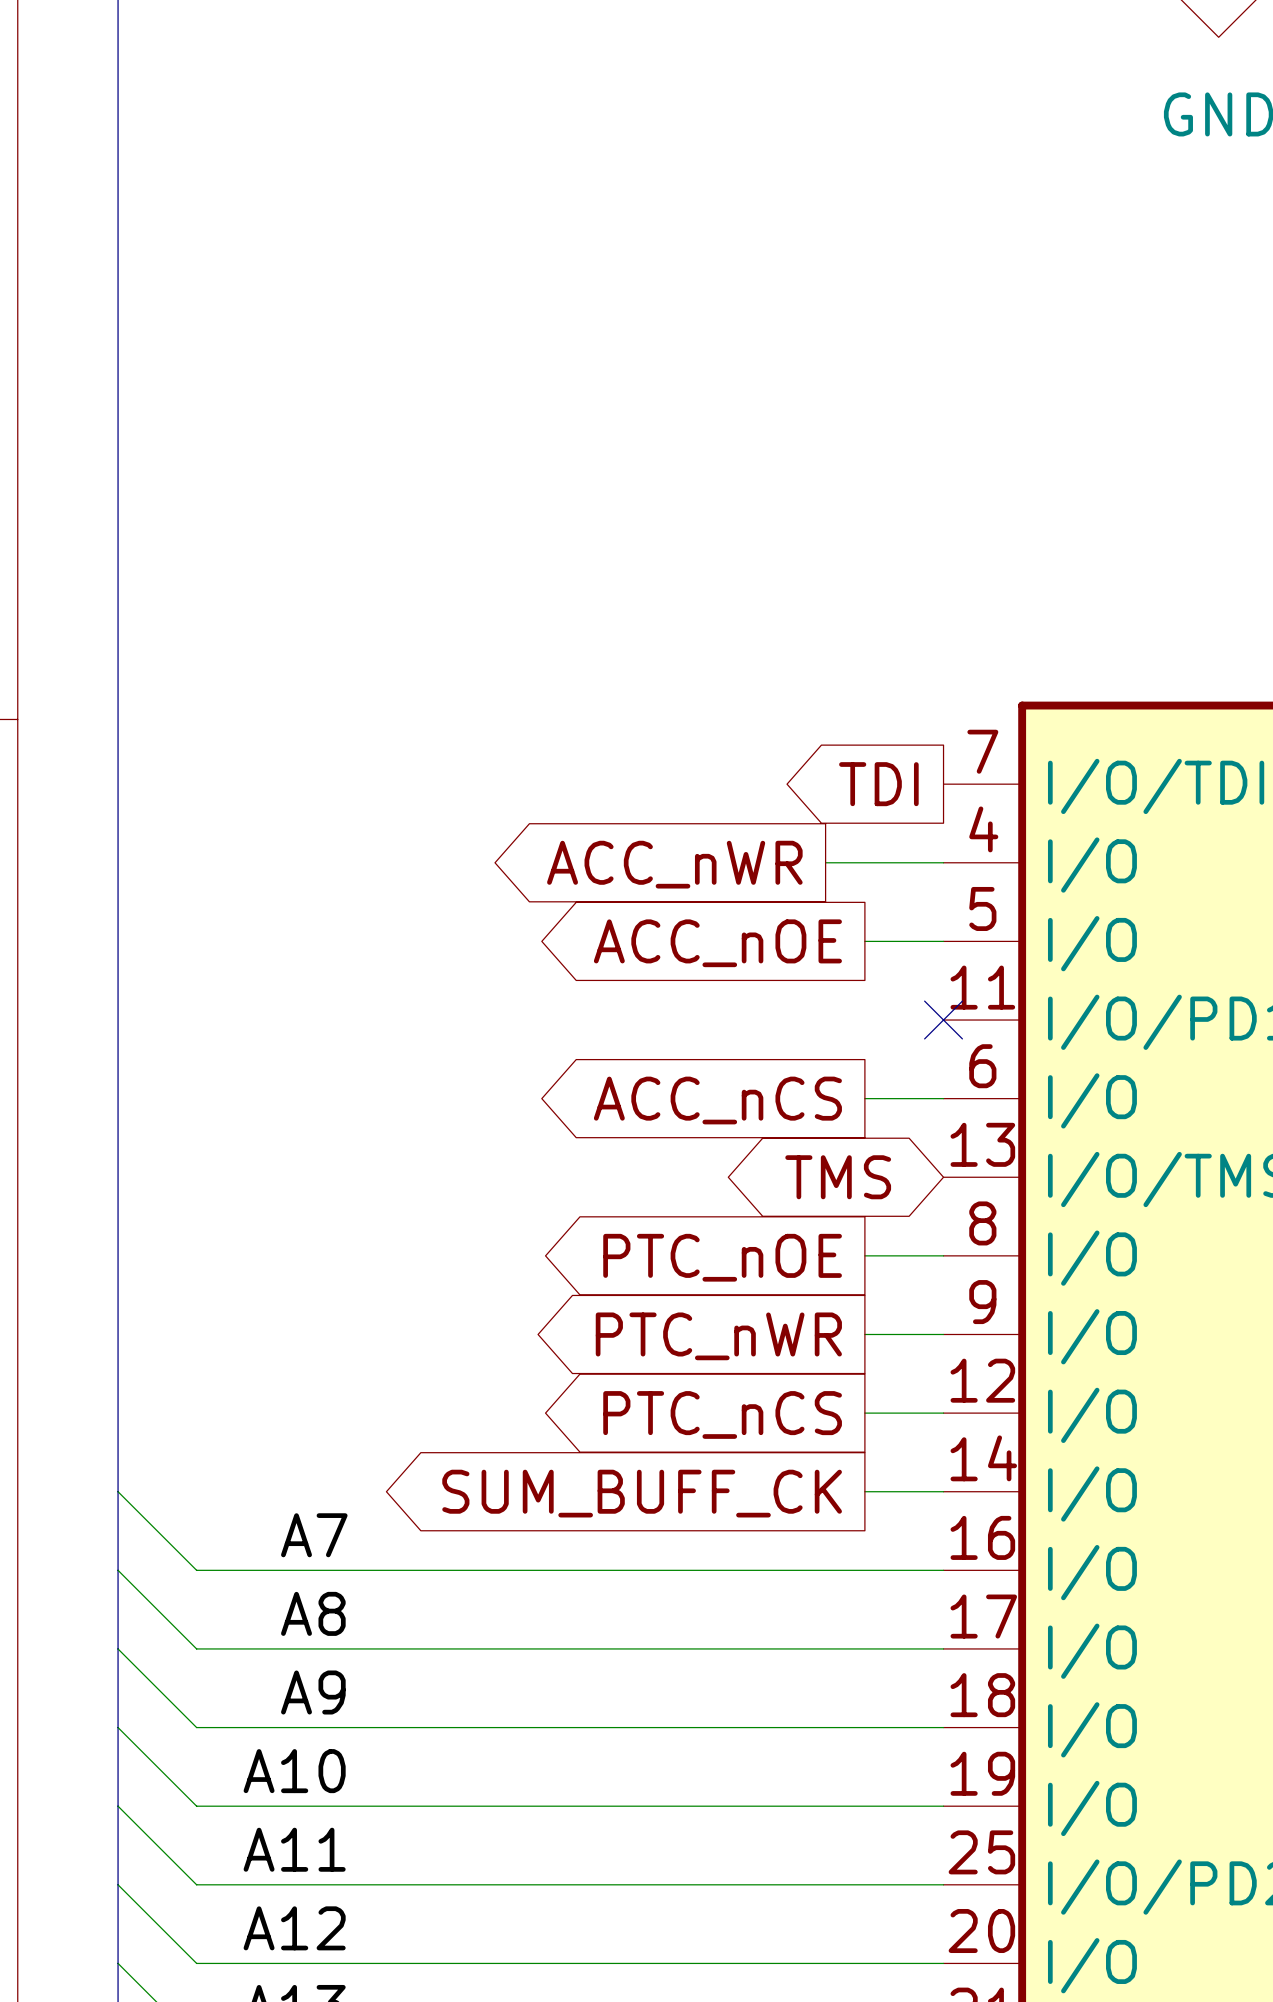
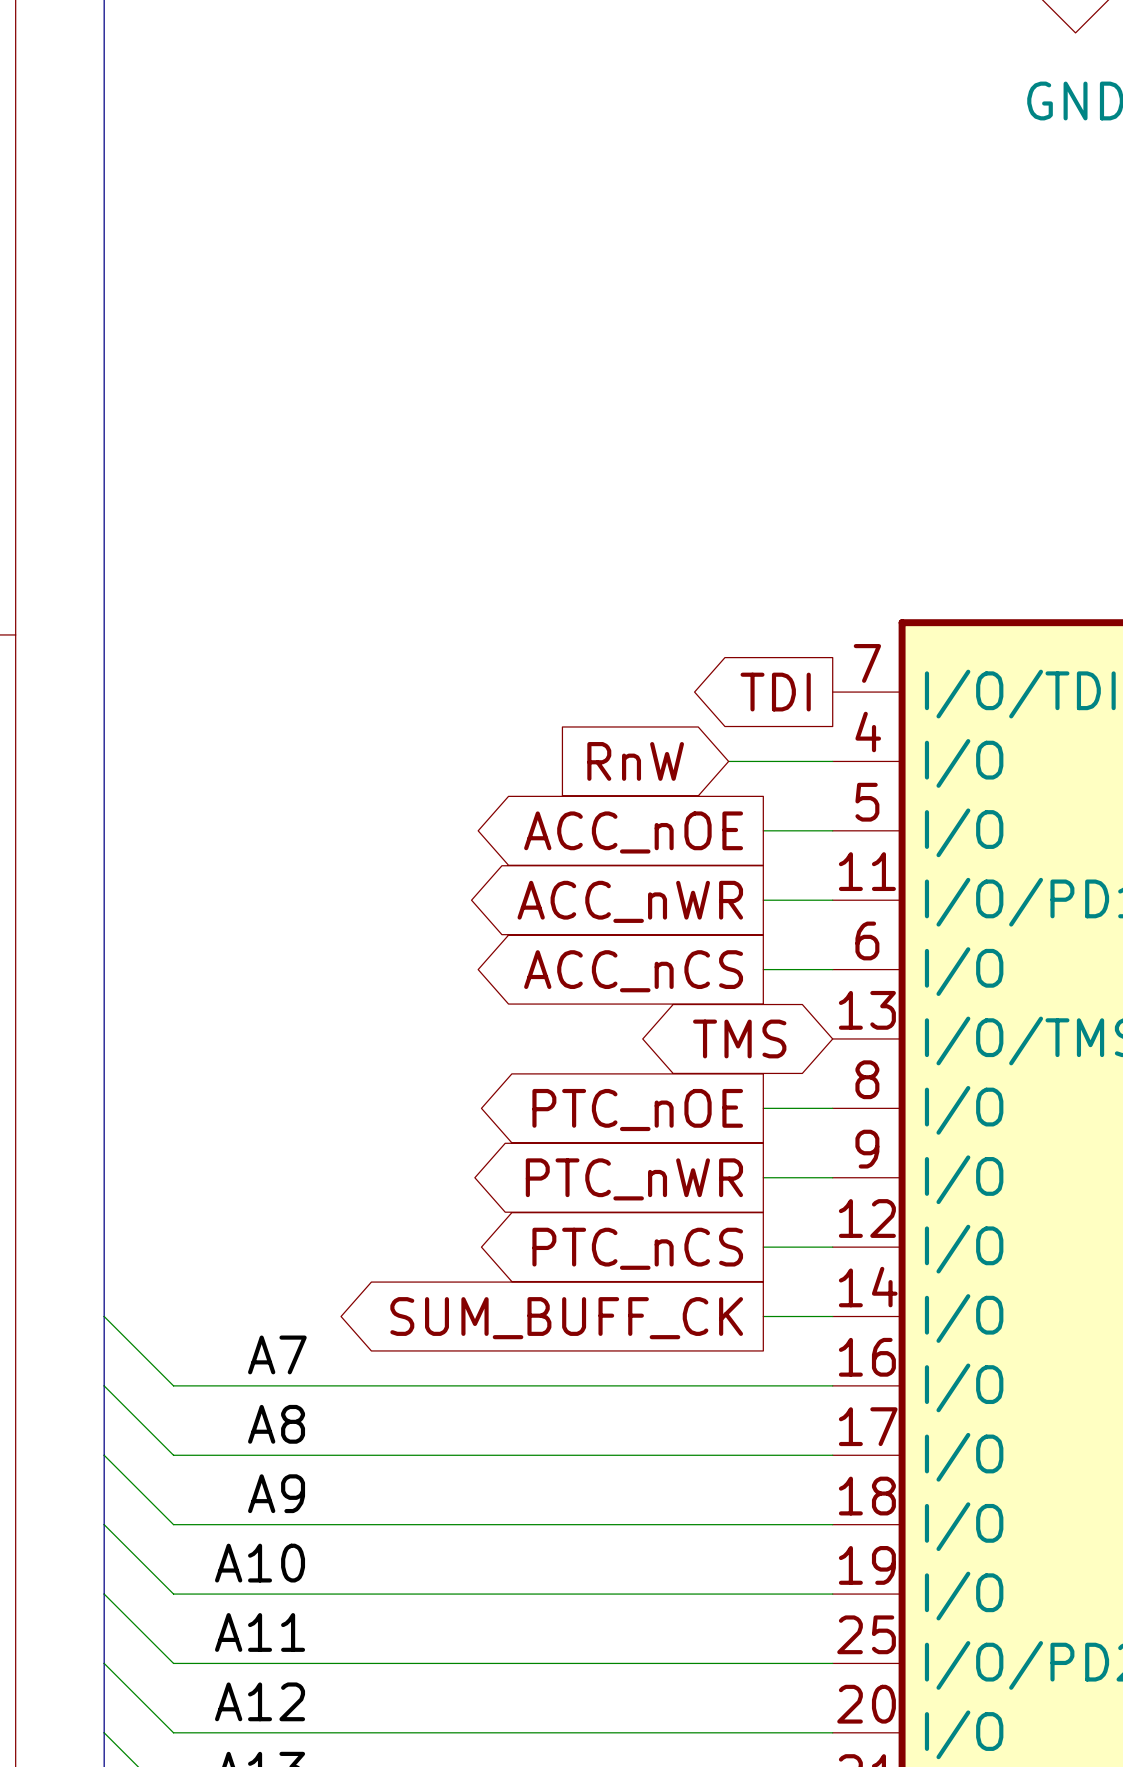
global label shape: output (674, 864) -> input (635, 761)
global label: ACC_nWR (674, 864) -> RnW (635, 761)
wire: none -> (763, 900) (832, 900)
no-connect mark: (943, 1020) -> none
global label: none -> ACC_nWR (630, 901)

